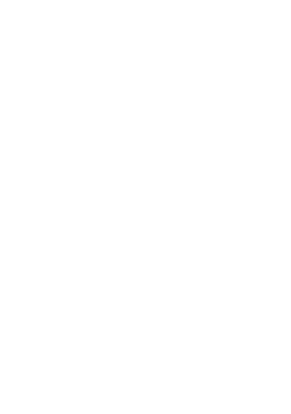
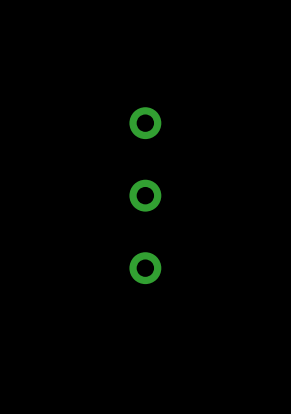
part: none -> (145, 195)

